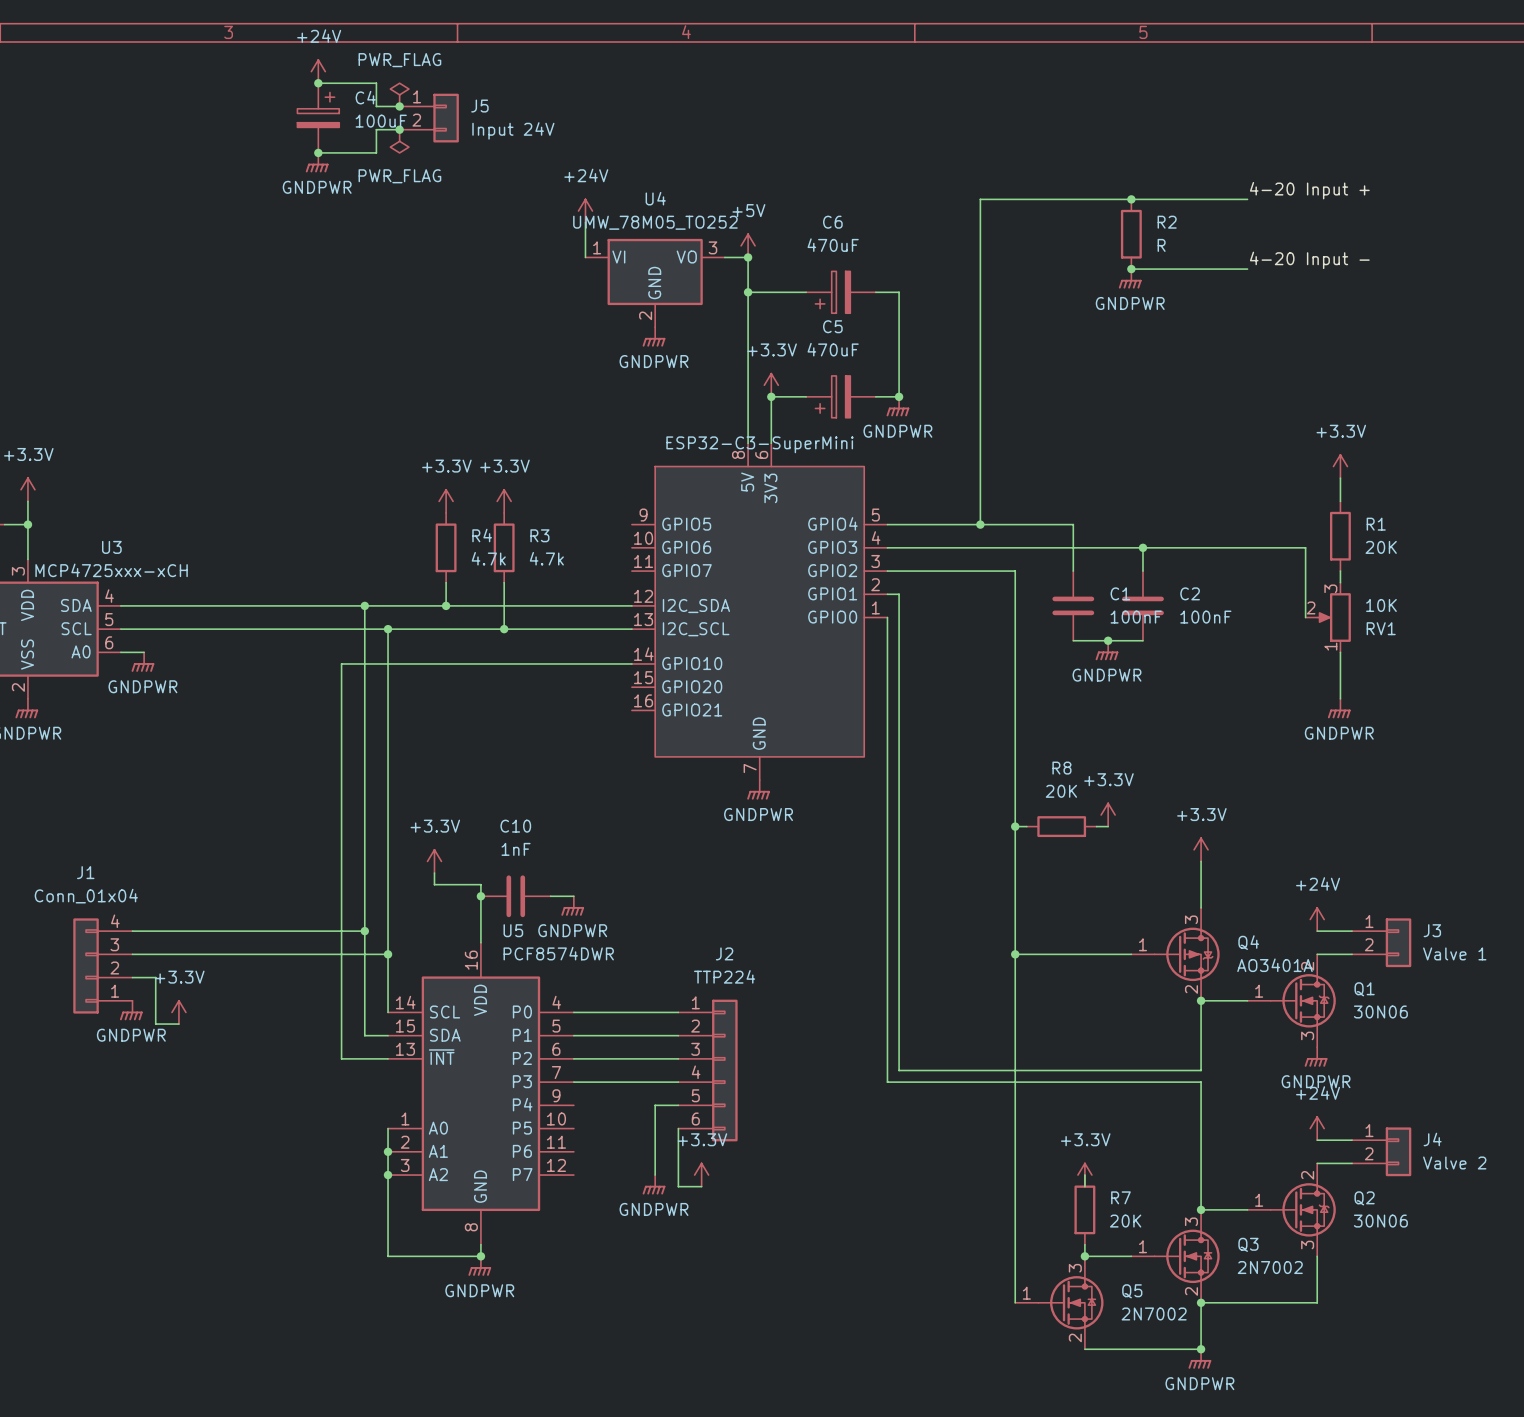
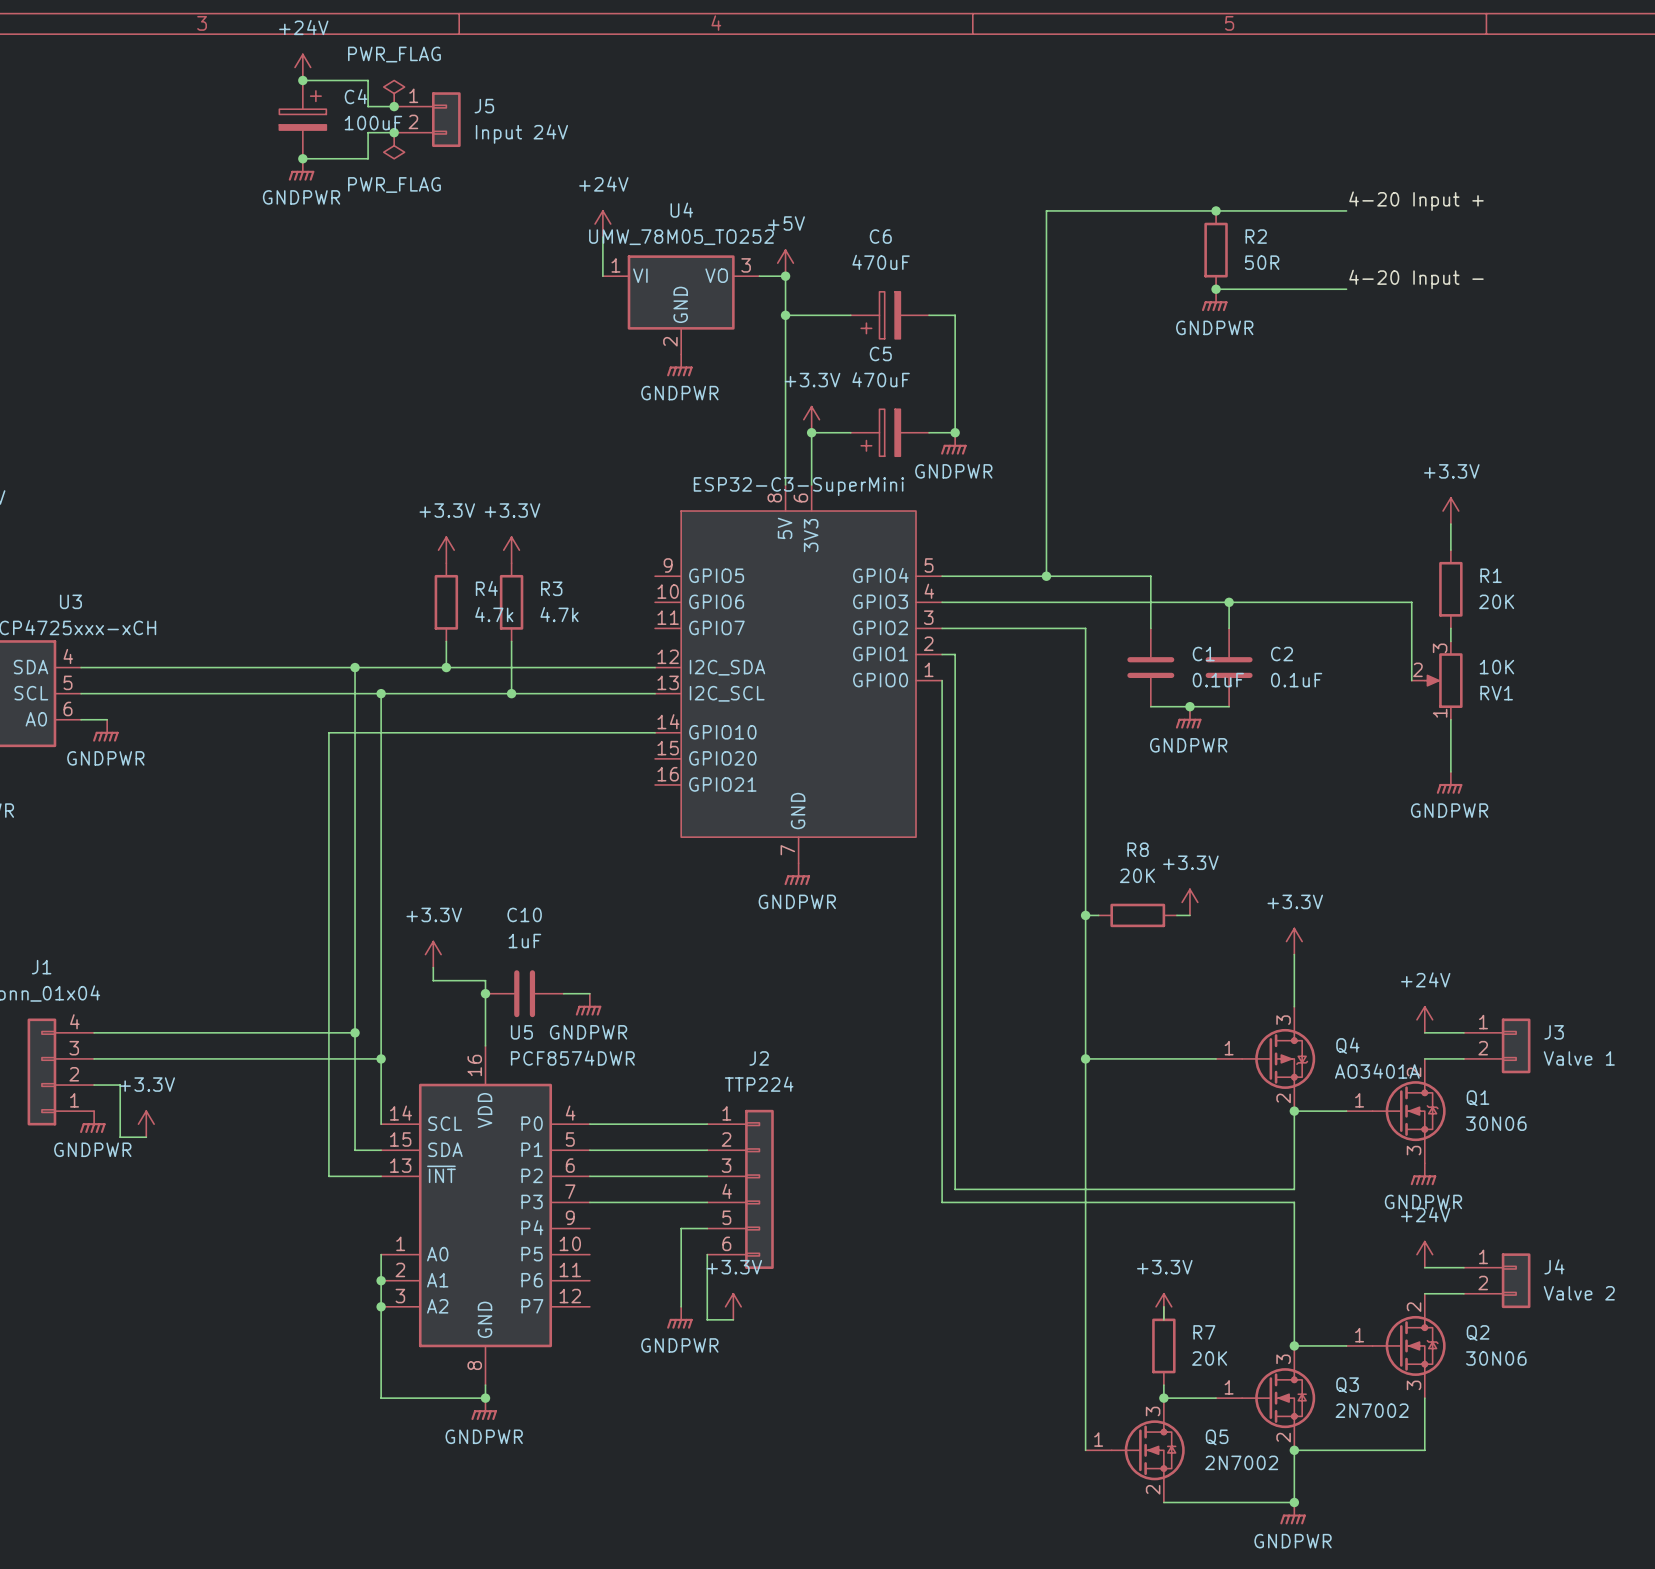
R2 value: R (1161, 245) -> 50R (1262, 262)
C1 value: 100nF (1136, 617) -> 0.1uF (1218, 680)
C2 value: 100nF (1205, 617) -> 0.1uF (1296, 680)
C10 value: 1nF (516, 849) -> 1uF (524, 941)

